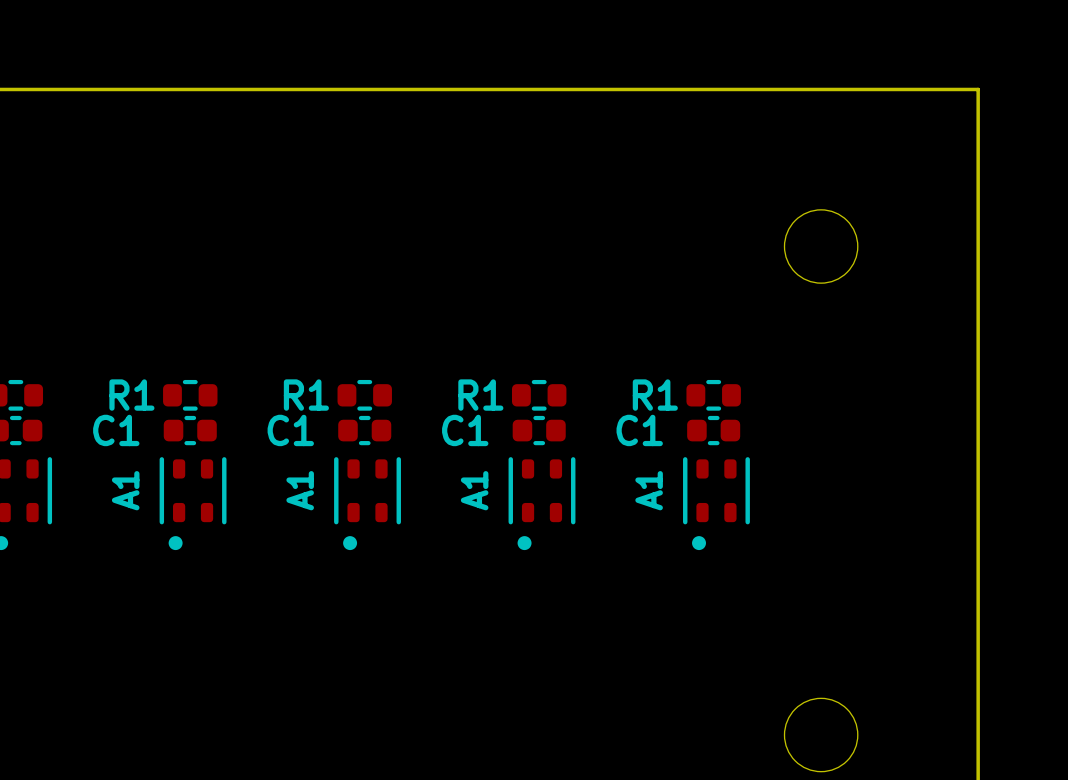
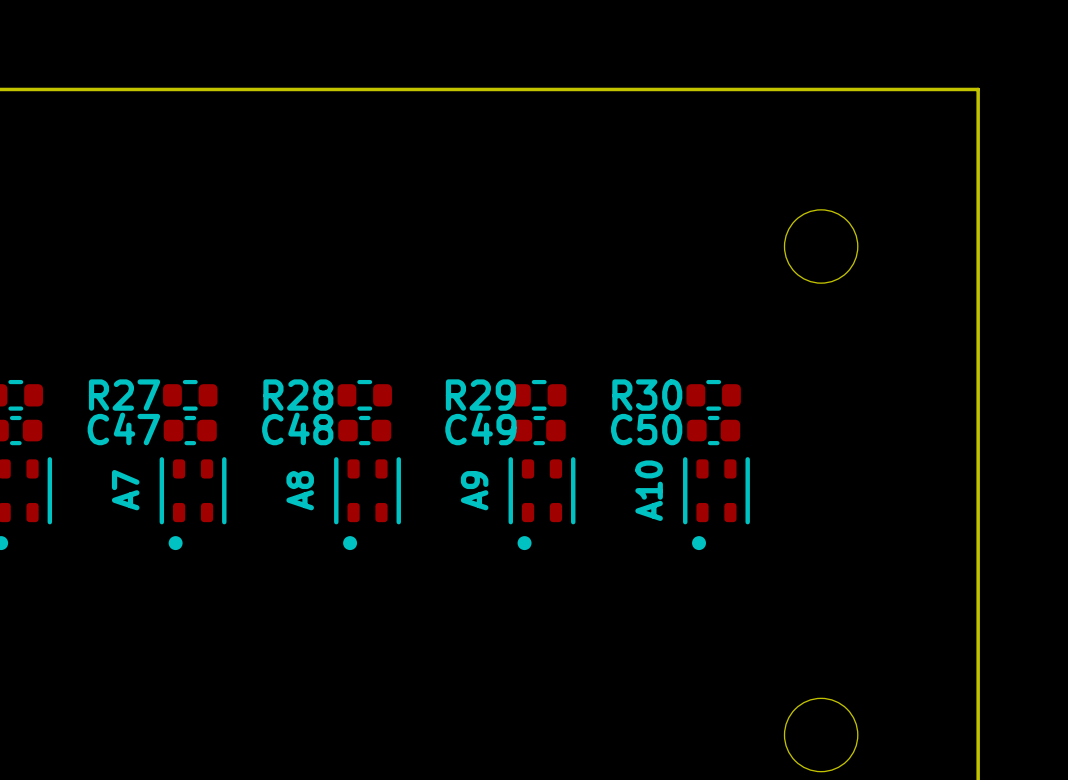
R1 name: R1 (131, 395) -> R27 (124, 395)
R1 name: R1 (306, 395) -> R28 (298, 395)
R1 name: R1 (480, 395) -> R29 (480, 395)
R1 name: R1 (655, 395) -> R30 (647, 395)
C1 name: C1 (116, 430) -> C47 (123, 428)
C1 name: C1 (290, 430) -> C48 (297, 428)
C1 name: C1 (465, 430) -> C49 (480, 428)
C1 name: C1 (639, 430) -> C50 (646, 429)
A1 name: A1 (125, 490) -> A7 (125, 490)
A1 name: A1 (300, 490) -> A8 (300, 490)
A1 name: A1 (474, 490) -> A9 (474, 490)
A1 name: A1 (649, 490) -> A10 (649, 490)

